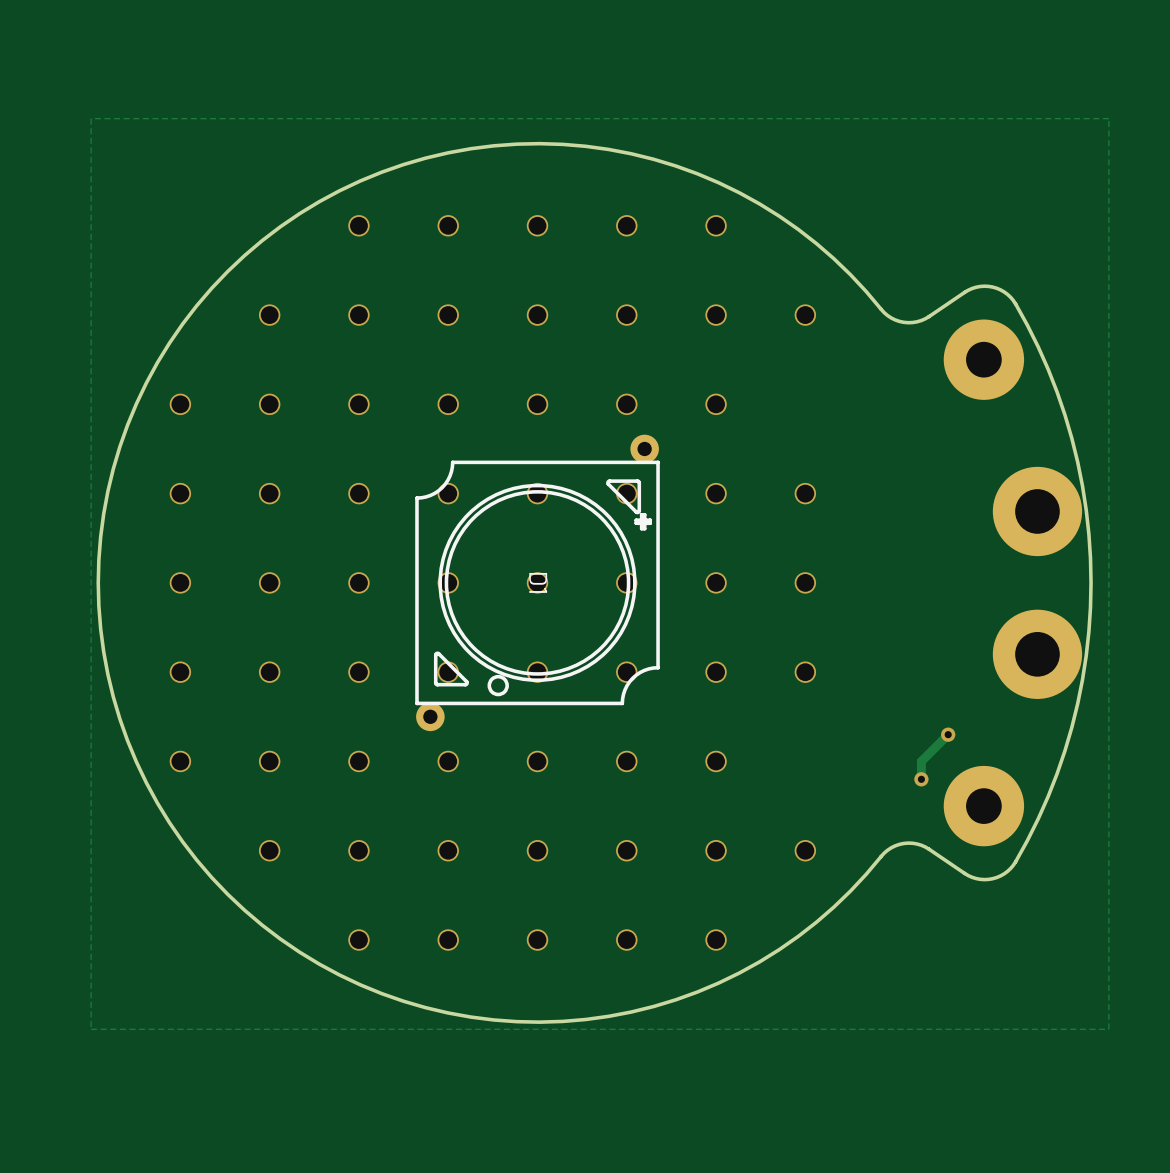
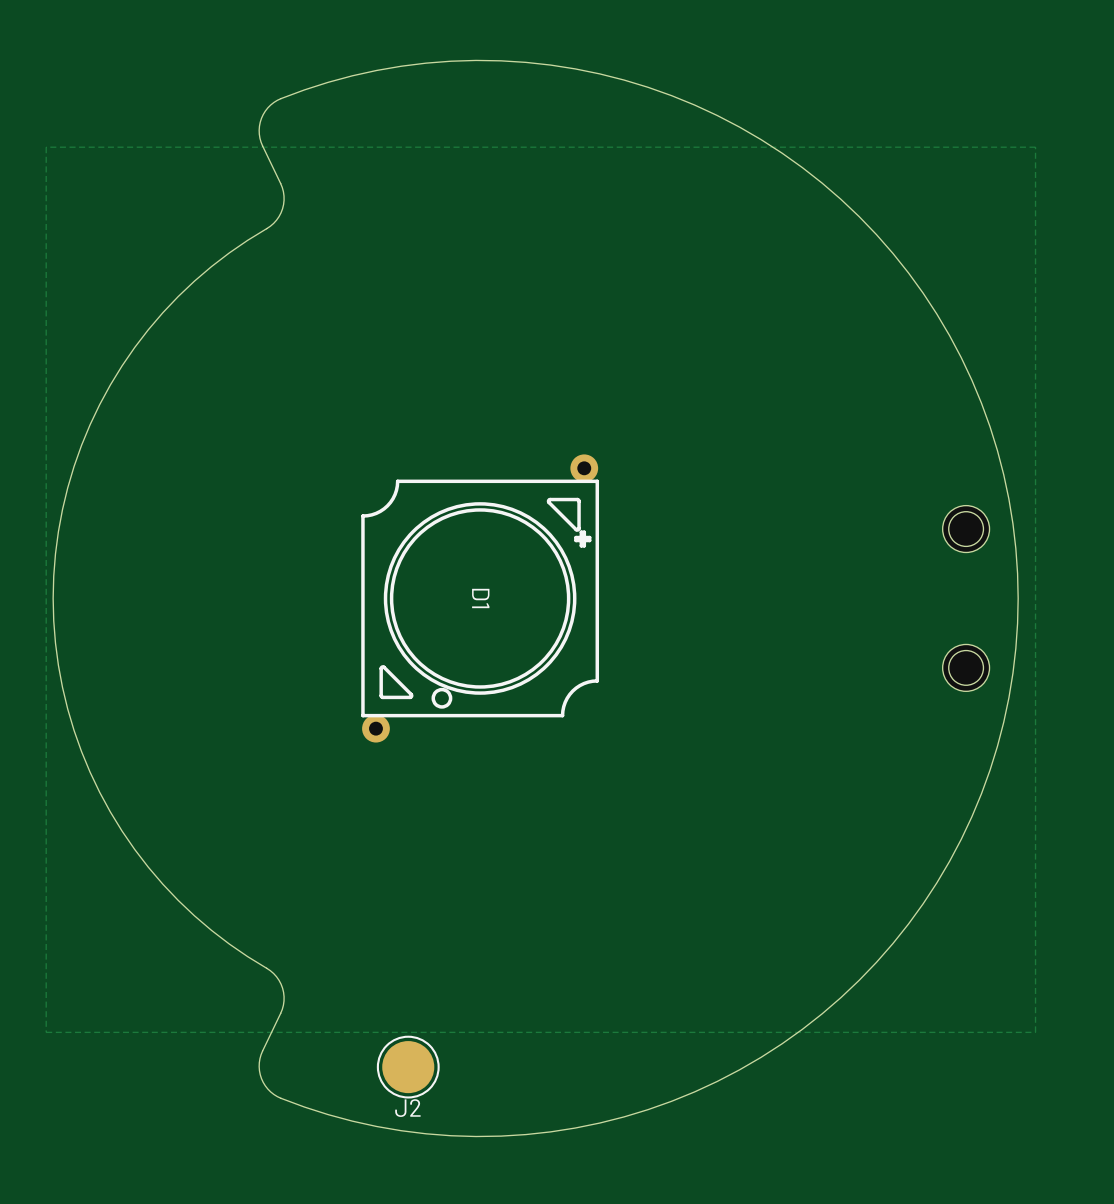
via: (358, 225) -> none
via: (448, 225) -> none
via: (537, 225) -> none
via: (626, 225) -> none
via: (716, 225) -> none
board edge: (964, 292) (921, 320) (908, 322) (895, 319) (884, 312) (850, 274) (816, 243) (759, 204) (718, 182) (675, 166) (631, 153) (585, 146) (516, 144) (448, 152) (381, 172) (339, 190) (299, 213) (262, 240) (227, 271) (182, 323) (157, 362) (136, 403) (119, 446) (107, 491) (98, 559) (98, 605) (103, 651) (113, 696) (127, 740) (146, 782) (169, 822) (196, 860) (227, 894) (262, 925) (319, 964) (360, 984) (403, 1001) (448, 1012) (516, 1021) (585, 1019) (631, 1012) (675, 999) (718, 982) (759, 961) (798, 936) (850, 891) (884, 853) (899, 844) (912, 843) (925, 846) (964, 873) (976, 878) (992, 878) (1004, 873) (1015, 861) (1038, 818) (1057, 773) (1071, 727) (1082, 679) (1088, 631) (1091, 582) (1088, 534) (1082, 485) (1064, 415) (1048, 369) (1027, 325) (1013, 300) (1000, 289) (984, 286) (964, 292) -> (281, 98) (265, 111) (259, 130) (261, 142) (283, 191) (283, 204) (279, 216) (270, 226) (229, 252) (194, 281) (148, 329) (122, 365) (99, 404) (74, 466) (58, 531) (53, 598) (55, 643) (62, 687) (81, 751) (99, 792) (122, 831) (162, 884) (211, 930) (270, 970) (279, 980) (283, 992) (283, 1005) (261, 1054) (259, 1066) (263, 1082) (277, 1096) (328, 1114) (376, 1126) (426, 1133) (476, 1136) (525, 1134) (575, 1128) (624, 1116) (671, 1101) (717, 1081) (761, 1057) (802, 1029) (840, 997) (876, 962) (923, 903) (949, 861) (971, 816) (997, 746) (1008, 697) (1015, 648) (1018, 598) (1015, 548) (1008, 499) (997, 450) (981, 403) (961, 357) (936, 313) (908, 272) (876, 234) (822, 183) (782, 153) (739, 127) (694, 105) (648, 87) (599, 73) (550, 65) (500, 60) (451, 61) (401, 66) (352, 75) (281, 98)
via: (269, 315) -> none
via: (358, 315) -> none
via: (448, 315) -> none
via: (537, 315) -> none
via: (626, 315) -> none
via: (716, 315) -> none
via: (805, 315) -> none
part: (983, 359) -> none
via: (180, 404) -> none
via: (269, 404) -> none
via: (358, 404) -> none
via: (448, 404) -> none
via: (537, 404) -> none
via: (626, 404) -> none
via: (716, 404) -> none
part footprint: [992, 466, 1083, 557] -> [942, 505, 990, 553]
via: (180, 493) -> none
via: (269, 493) -> none
via: (358, 493) -> none
via: (448, 493) -> none
via: (537, 493) -> none
via: (626, 493) -> none
via: (716, 493) -> none
via: (805, 493) -> none
round board edge: none -> [948, 511, 984, 547]
via: (180, 582) -> none
via: (269, 582) -> none
via: (358, 582) -> none
via: (448, 582) -> none
via: (537, 582) -> none
via: (626, 582) -> none
via: (716, 582) -> none
via: (805, 582) -> none
part footprint: [992, 609, 1083, 699] -> [942, 644, 990, 692]
round board edge: none -> [948, 650, 984, 686]
via: (180, 672) -> none
via: (269, 672) -> none
via: (358, 672) -> none
via: (448, 672) -> none
via: (537, 672) -> none
via: (626, 672) -> none
via: (716, 672) -> none
via: (805, 672) -> none
track: (948, 734) (921, 761) (921, 779) -> none
via: (948, 734) -> none
via: (180, 761) -> none
via: (269, 761) -> none
via: (358, 761) -> none
via: (448, 761) -> none
via: (537, 761) -> none
via: (626, 761) -> none
via: (716, 761) -> none
via: (921, 779) -> none
part: (983, 806) -> none
via: (269, 850) -> none
via: (358, 850) -> none
via: (448, 850) -> none
via: (537, 850) -> none
via: (626, 850) -> none
via: (716, 850) -> none
via: (805, 850) -> none
via: (358, 940) -> none
via: (448, 940) -> none
via: (537, 940) -> none
via: (626, 940) -> none
via: (716, 940) -> none
J2: none -> (408, 1067)

